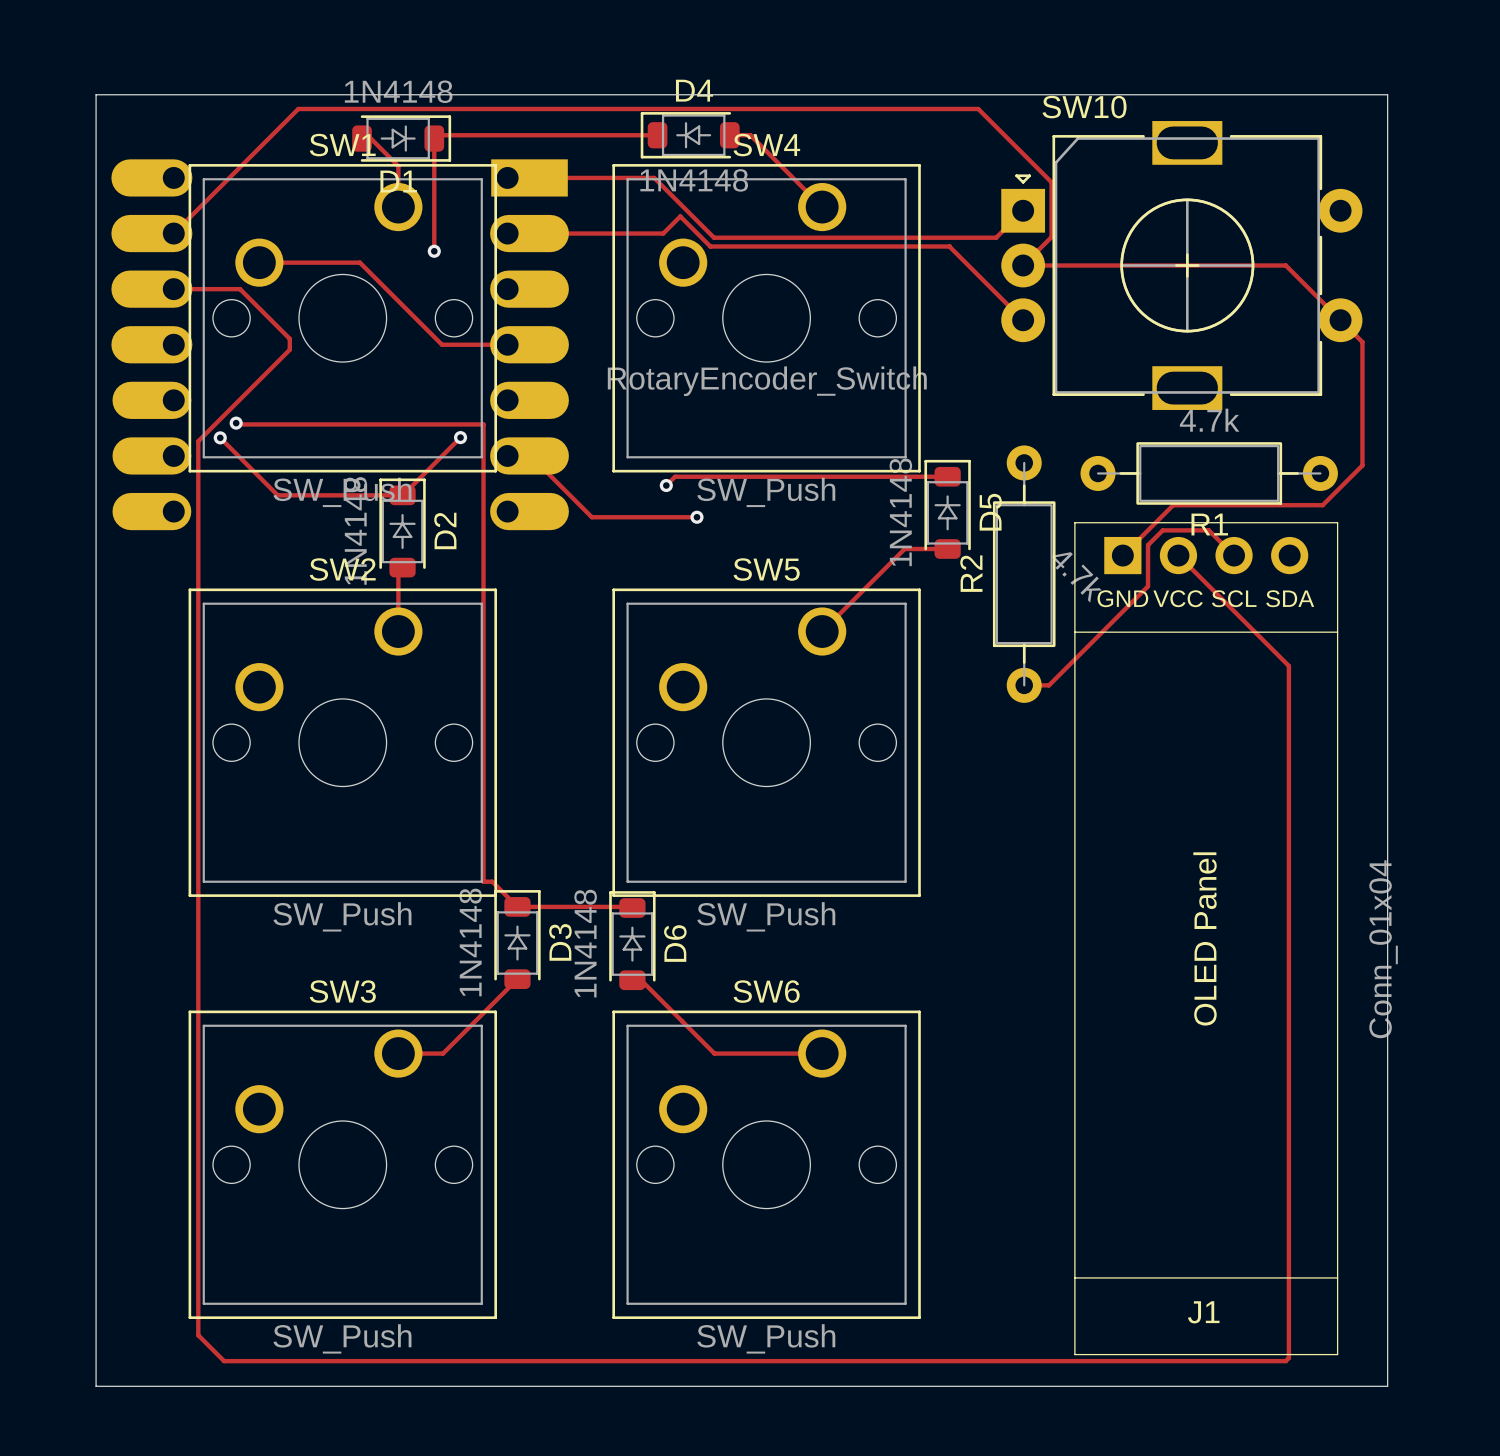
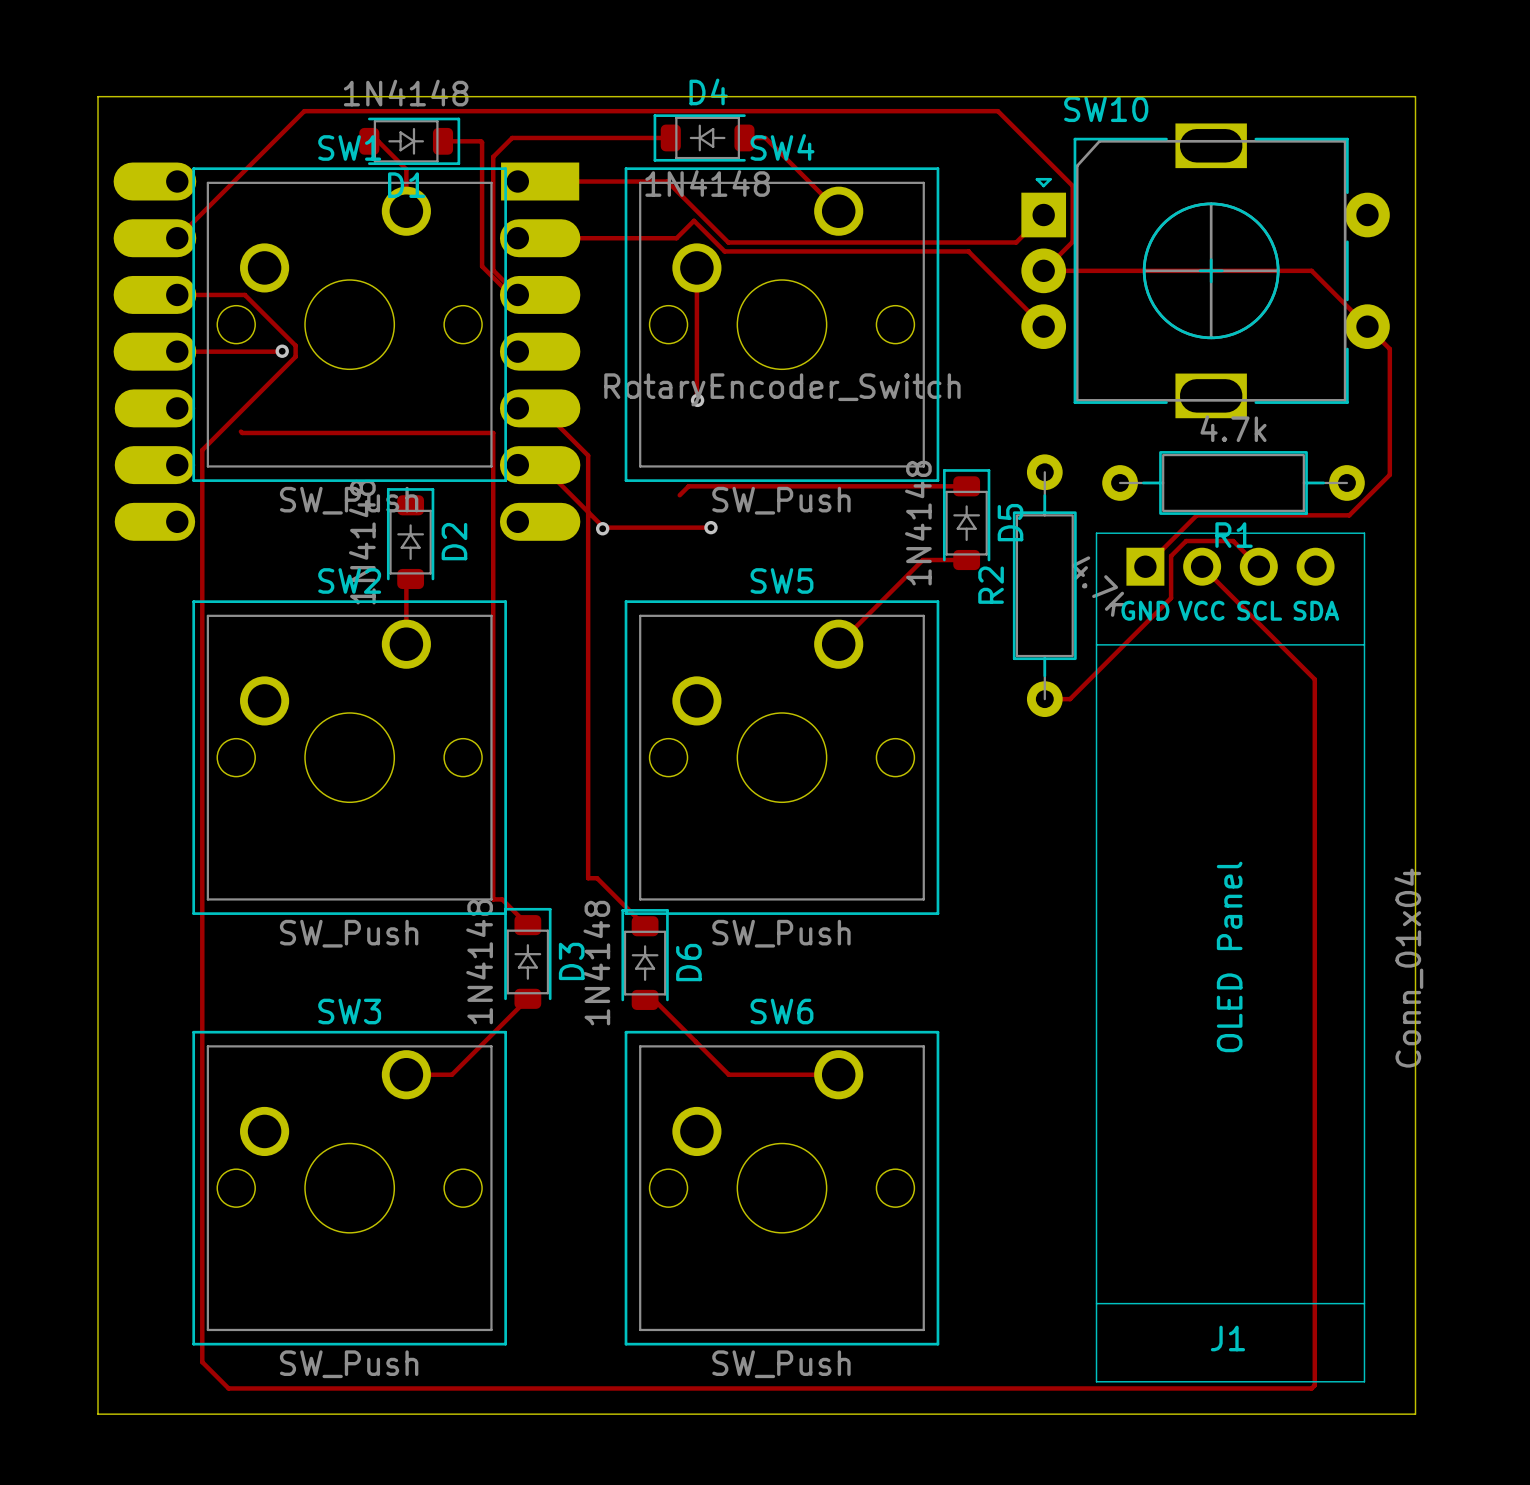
track: (502, 135) (437, 135) (434, 138) (434, 251) -> (512, 137) (493, 156) (493, 270) (517, 294) (510, 294) (482, 266) (482, 142) (443, 141)
via: (434, 251) -> none
track: (259, 262) (359, 262) (442, 344) (507, 344) -> none
track: none -> (696, 267) (697, 400)
track: none -> (282, 351) (177, 351)
via: none -> (282, 351)
via: none -> (697, 400)
via: (236, 423) -> none
via: (220, 437) -> none
track: (460, 437) (402, 495) (277, 495) (220, 437) -> none
via: (460, 437) -> none
via: (666, 485) -> none
via: none -> (602, 528)
track: (517, 906) (632, 908) -> (551, 408) (540, 408) (588, 455) (588, 878) (597, 878) (645, 926)

